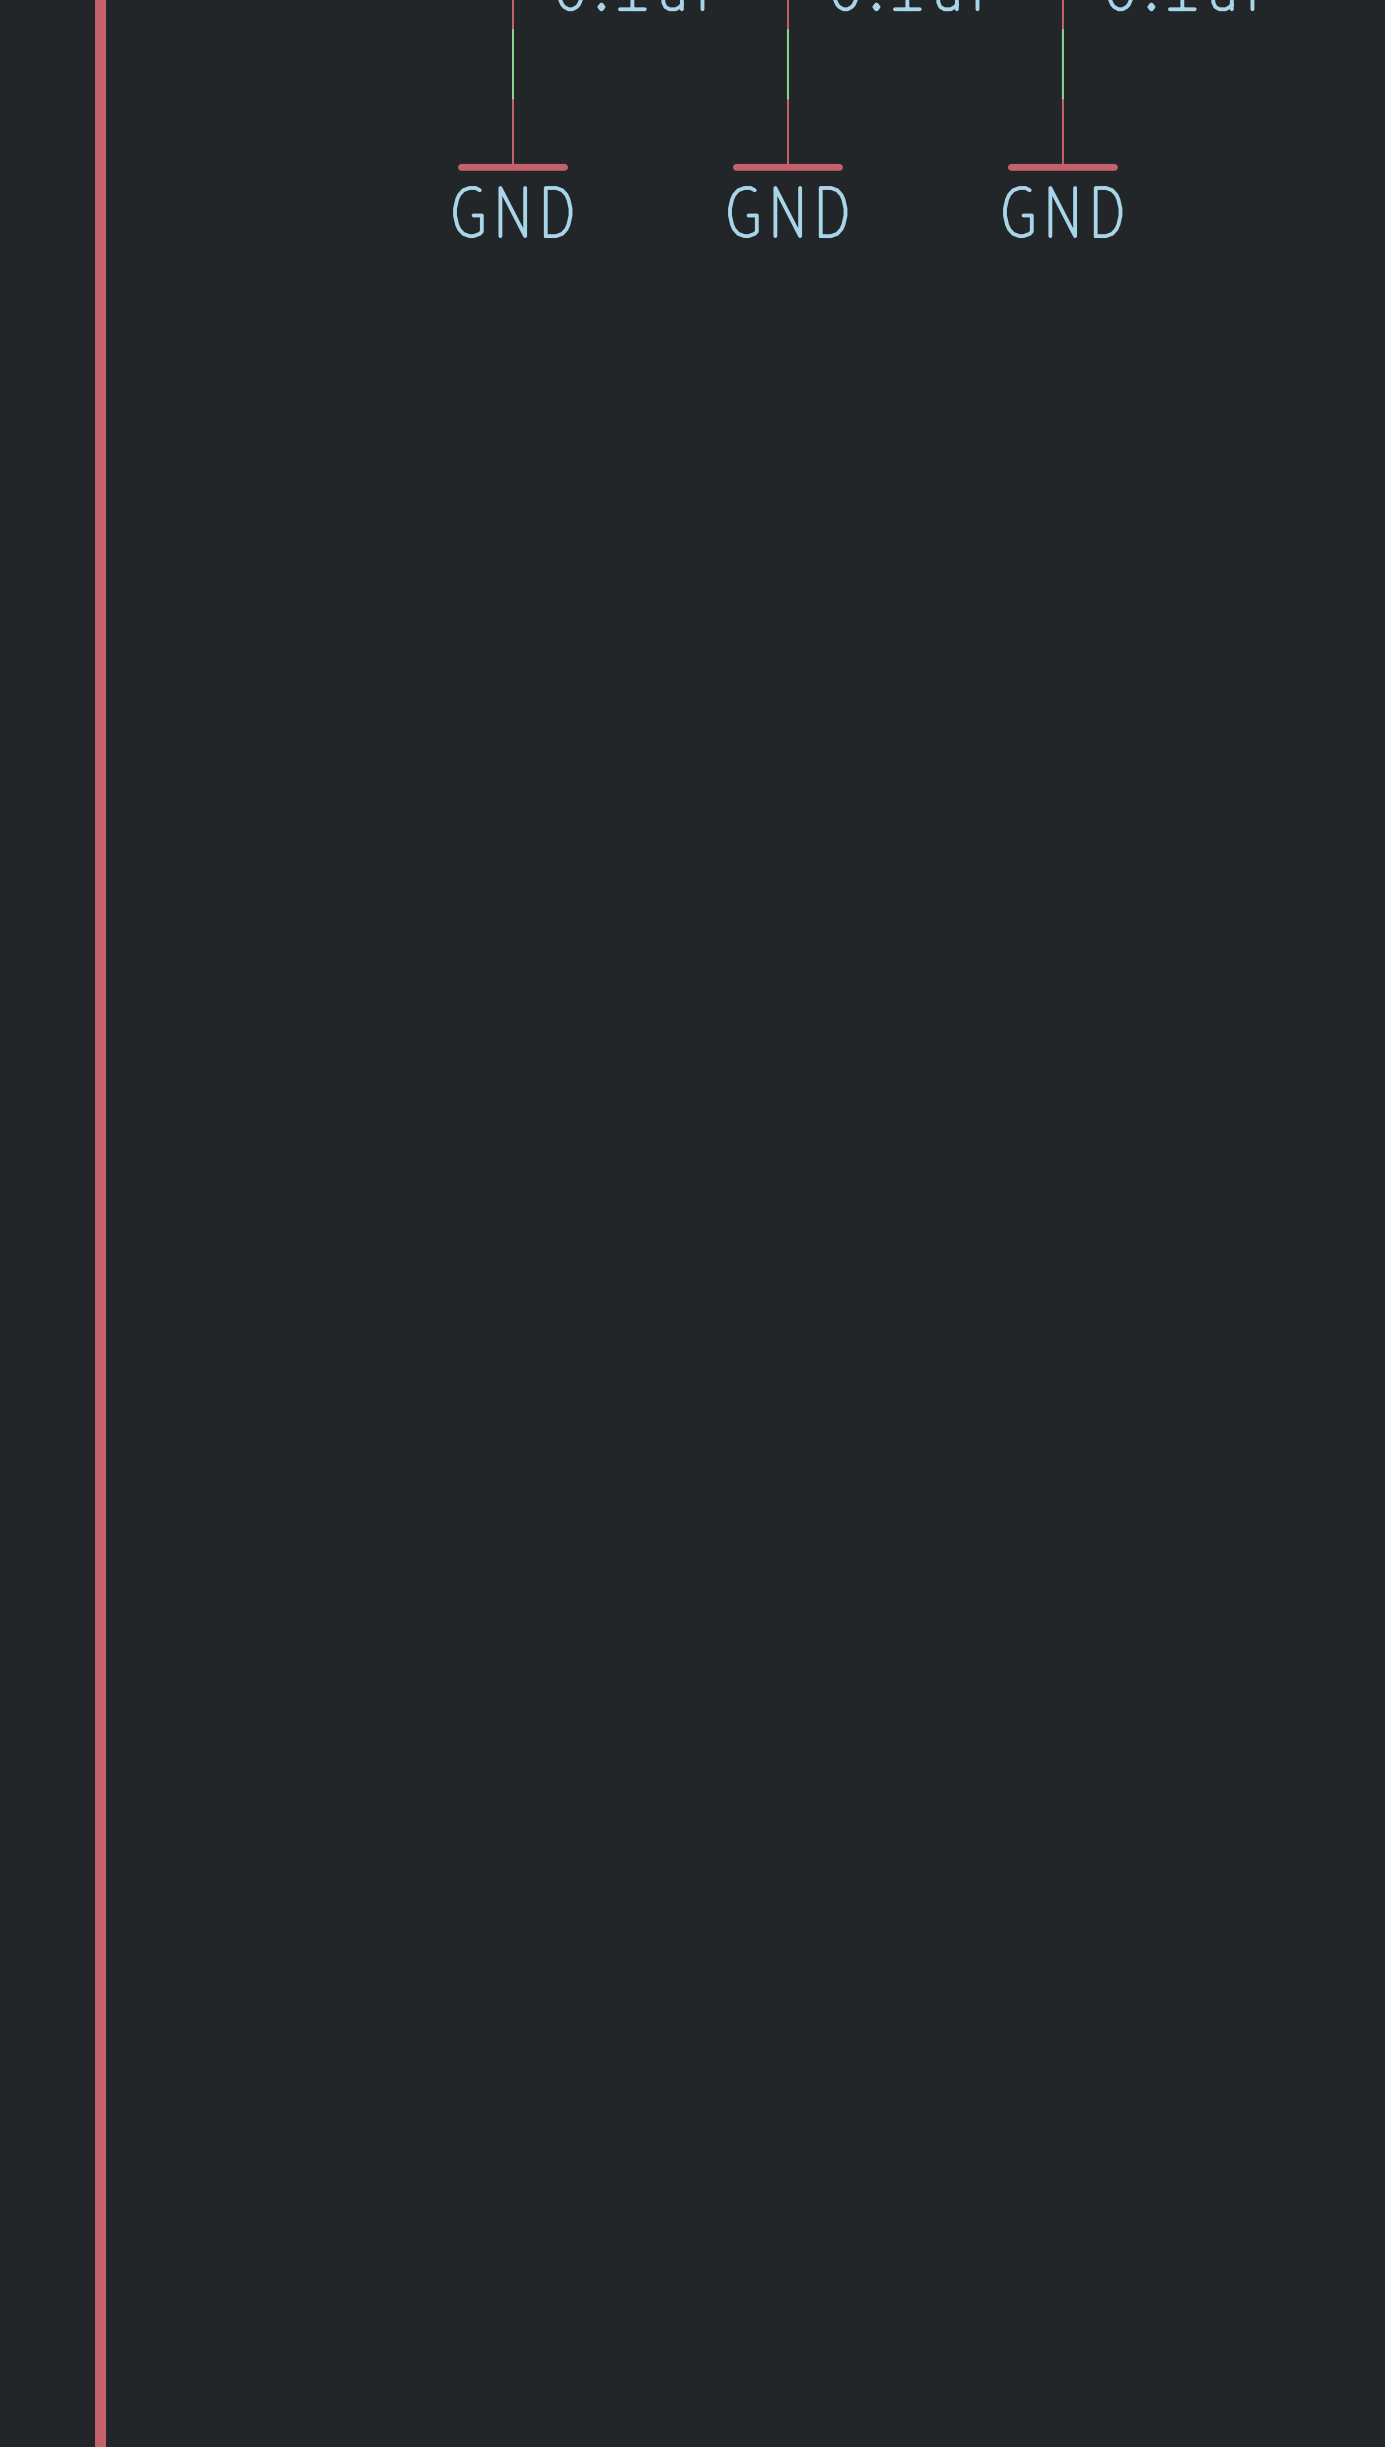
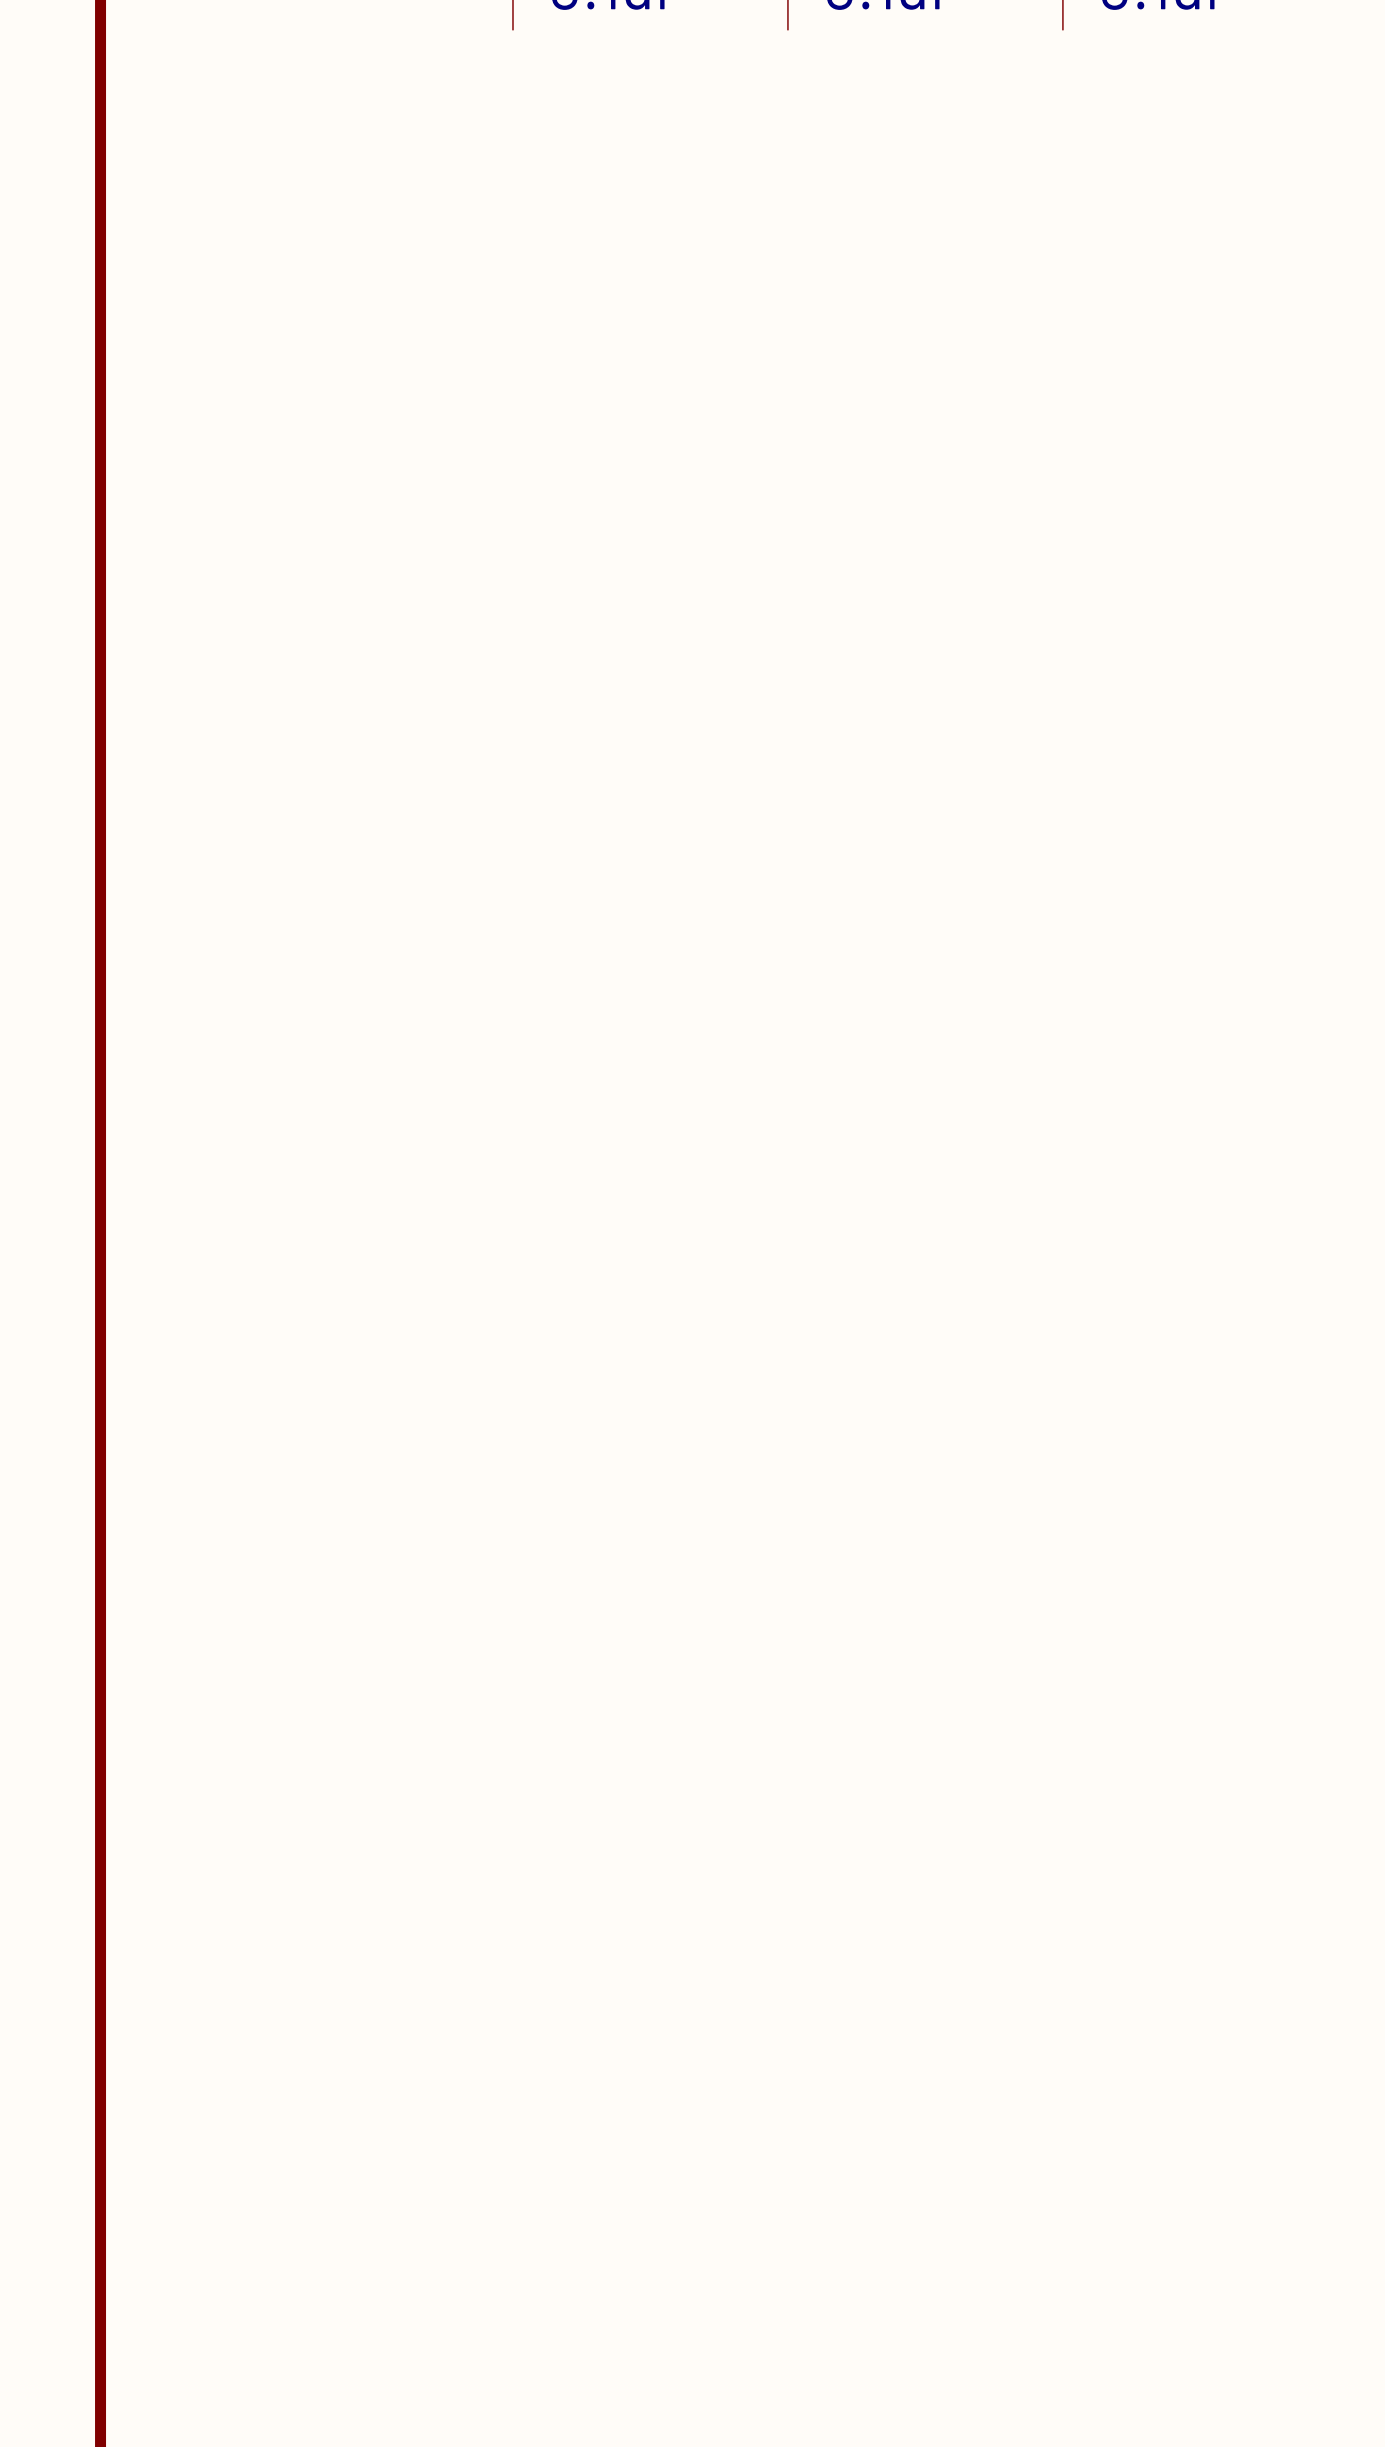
wire: (512, 29) (512, 98) -> none
wire: (787, 29) (787, 98) -> none
wire: (1062, 29) (1062, 98) -> none
power symbol: GND (512, 134) -> none
power symbol: GND (787, 134) -> none
power symbol: GND (1062, 134) -> none

